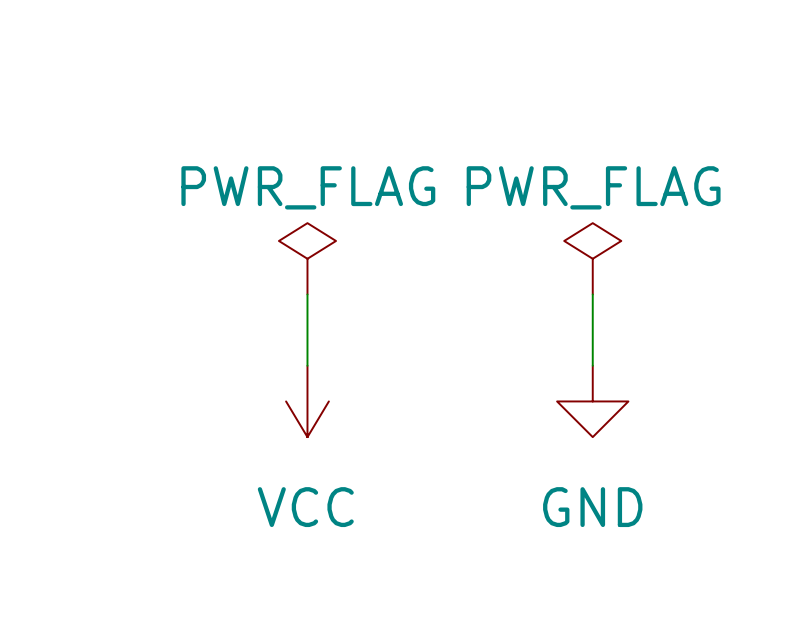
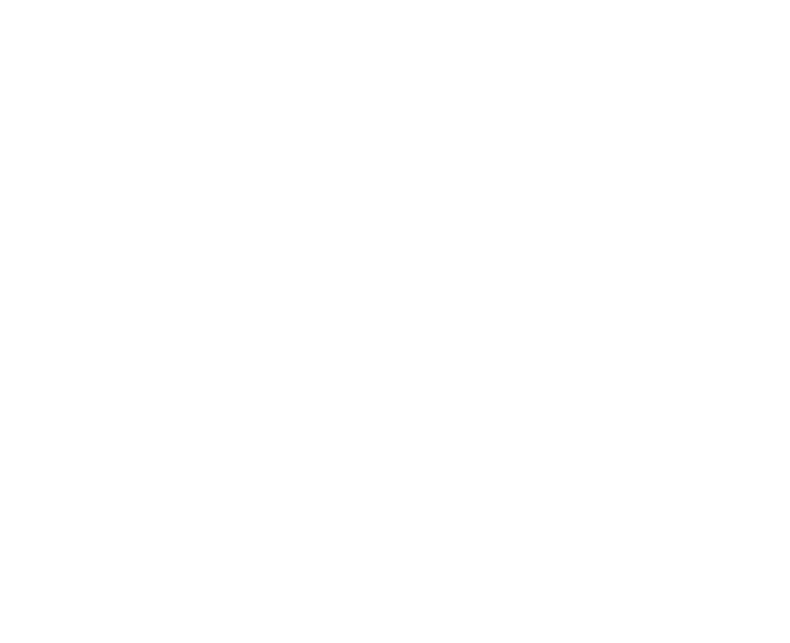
power symbol: PWR_FLAG (307, 258) -> none
power symbol: PWR_FLAG (592, 258) -> none
wire: (307, 294) (307, 365) -> none
wire: (592, 294) (592, 365) -> none
power symbol: VCC (307, 401) -> none
power symbol: GND (592, 401) -> none

